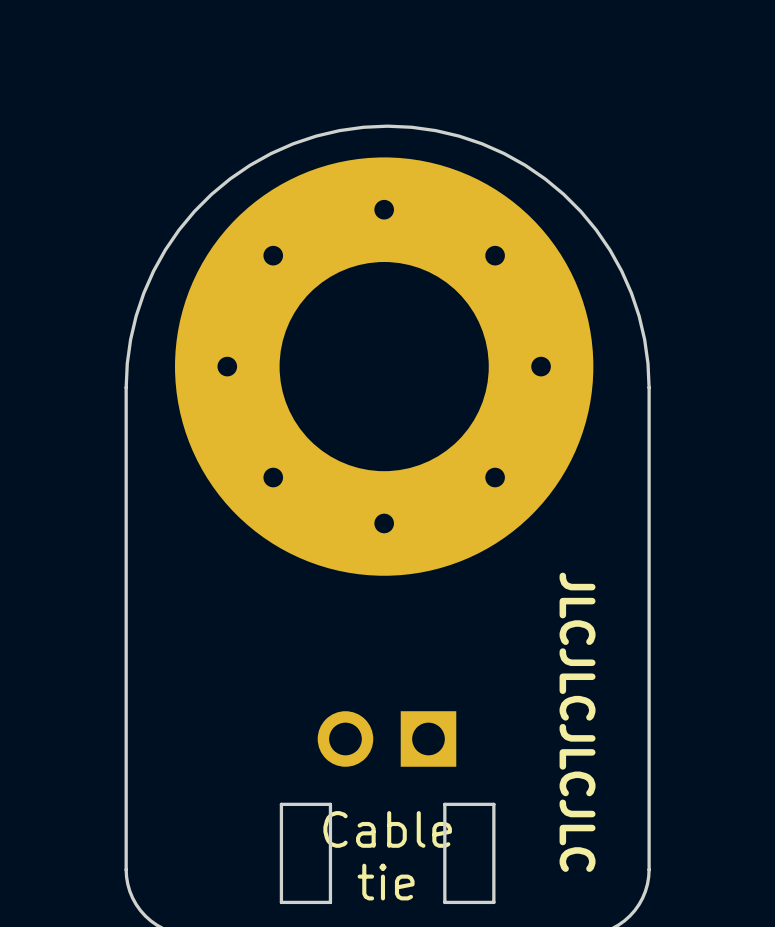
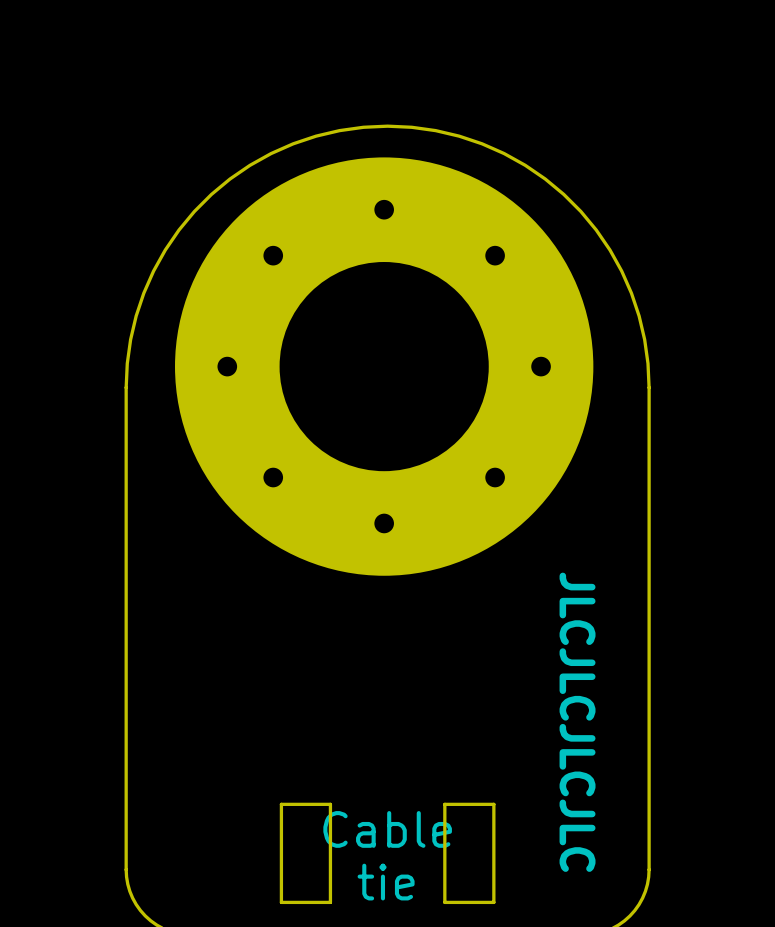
part: (386, 738) -> none

